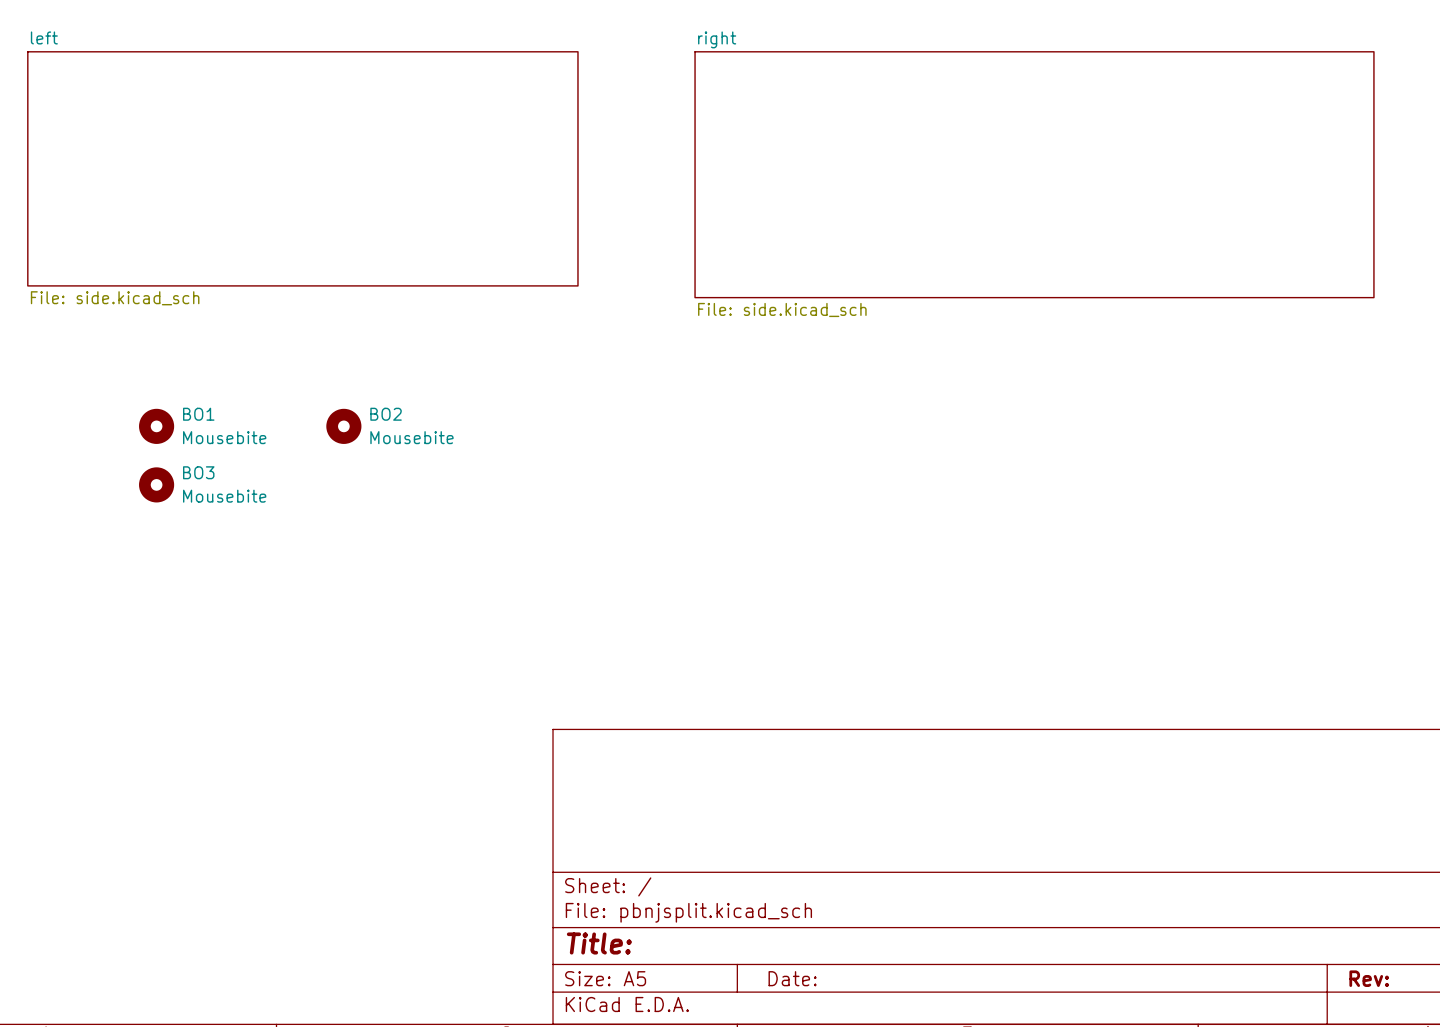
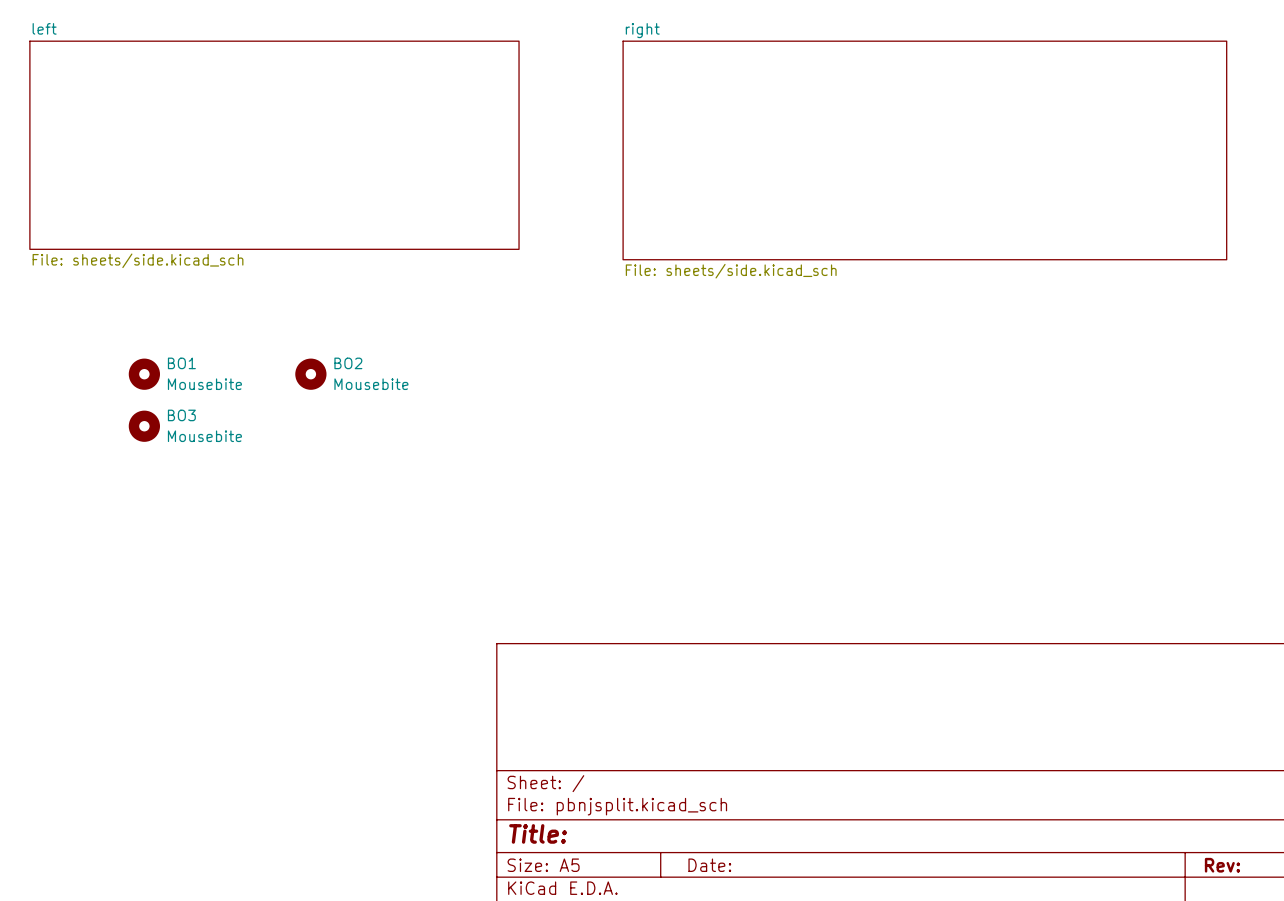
sheet left value: File: side.kicad_sch (115, 298) -> File: sheets/side.kicad_sch (138, 260)
sheet right value: File: side.kicad_sch (782, 309) -> File: sheets/side.kicad_sch (731, 271)

